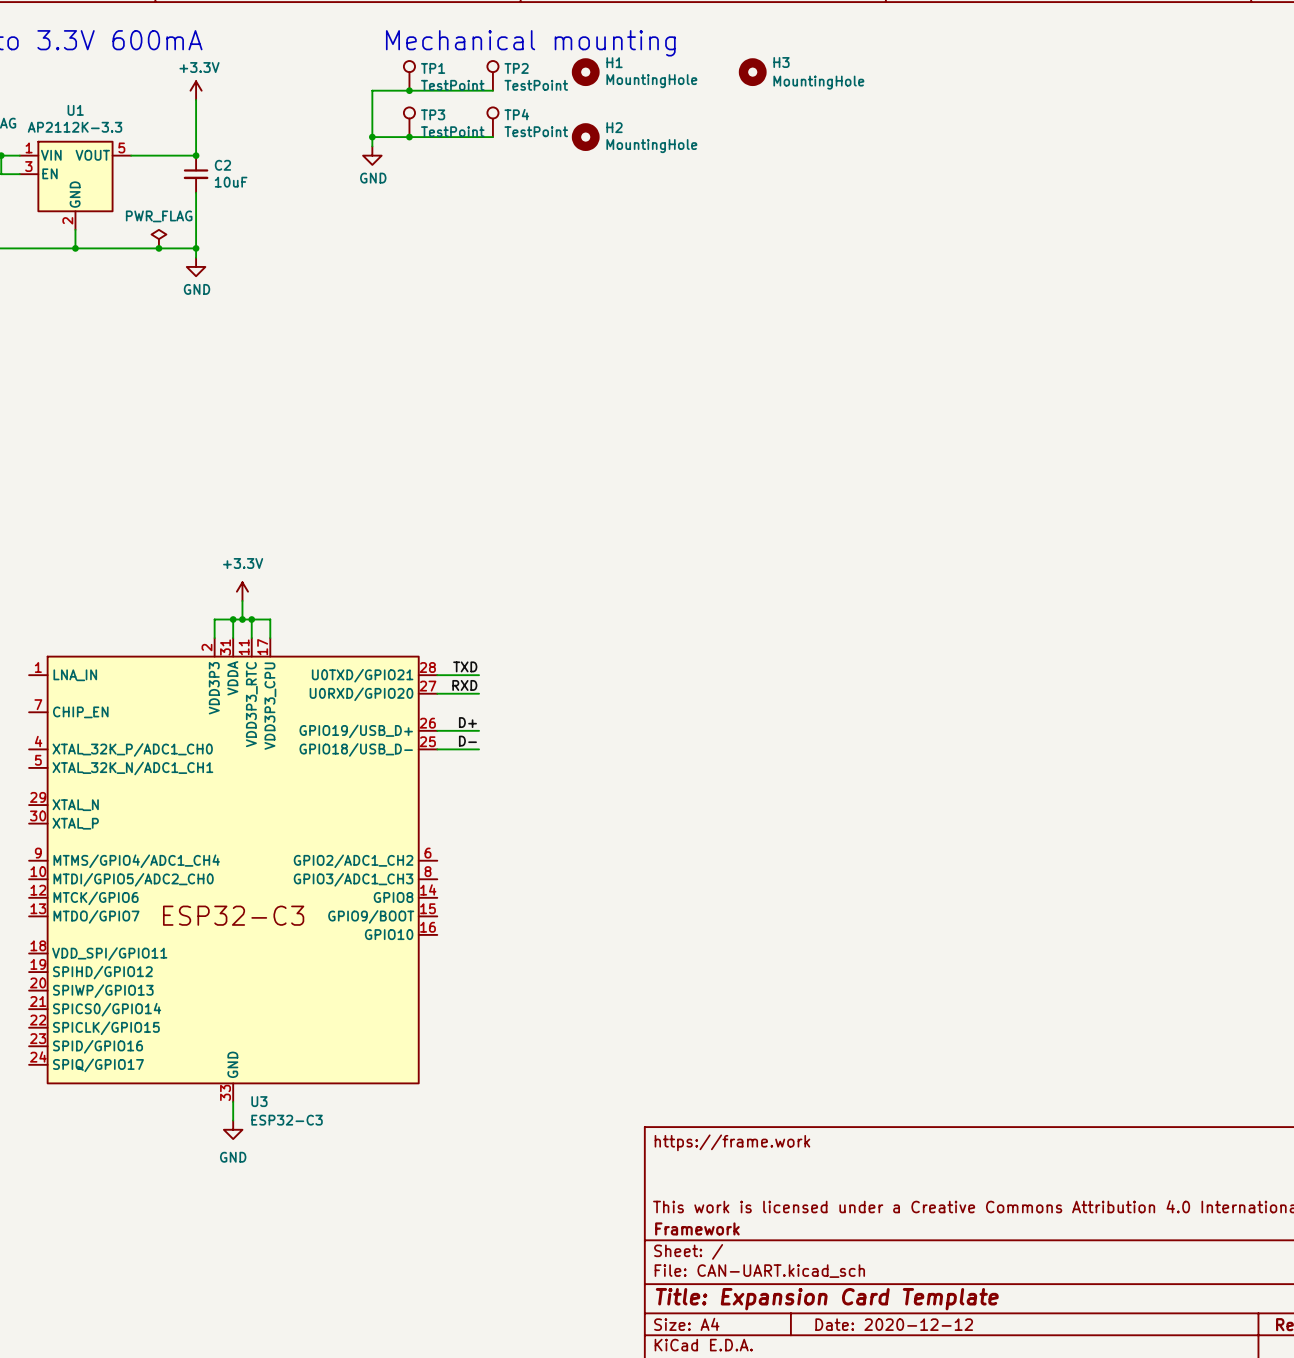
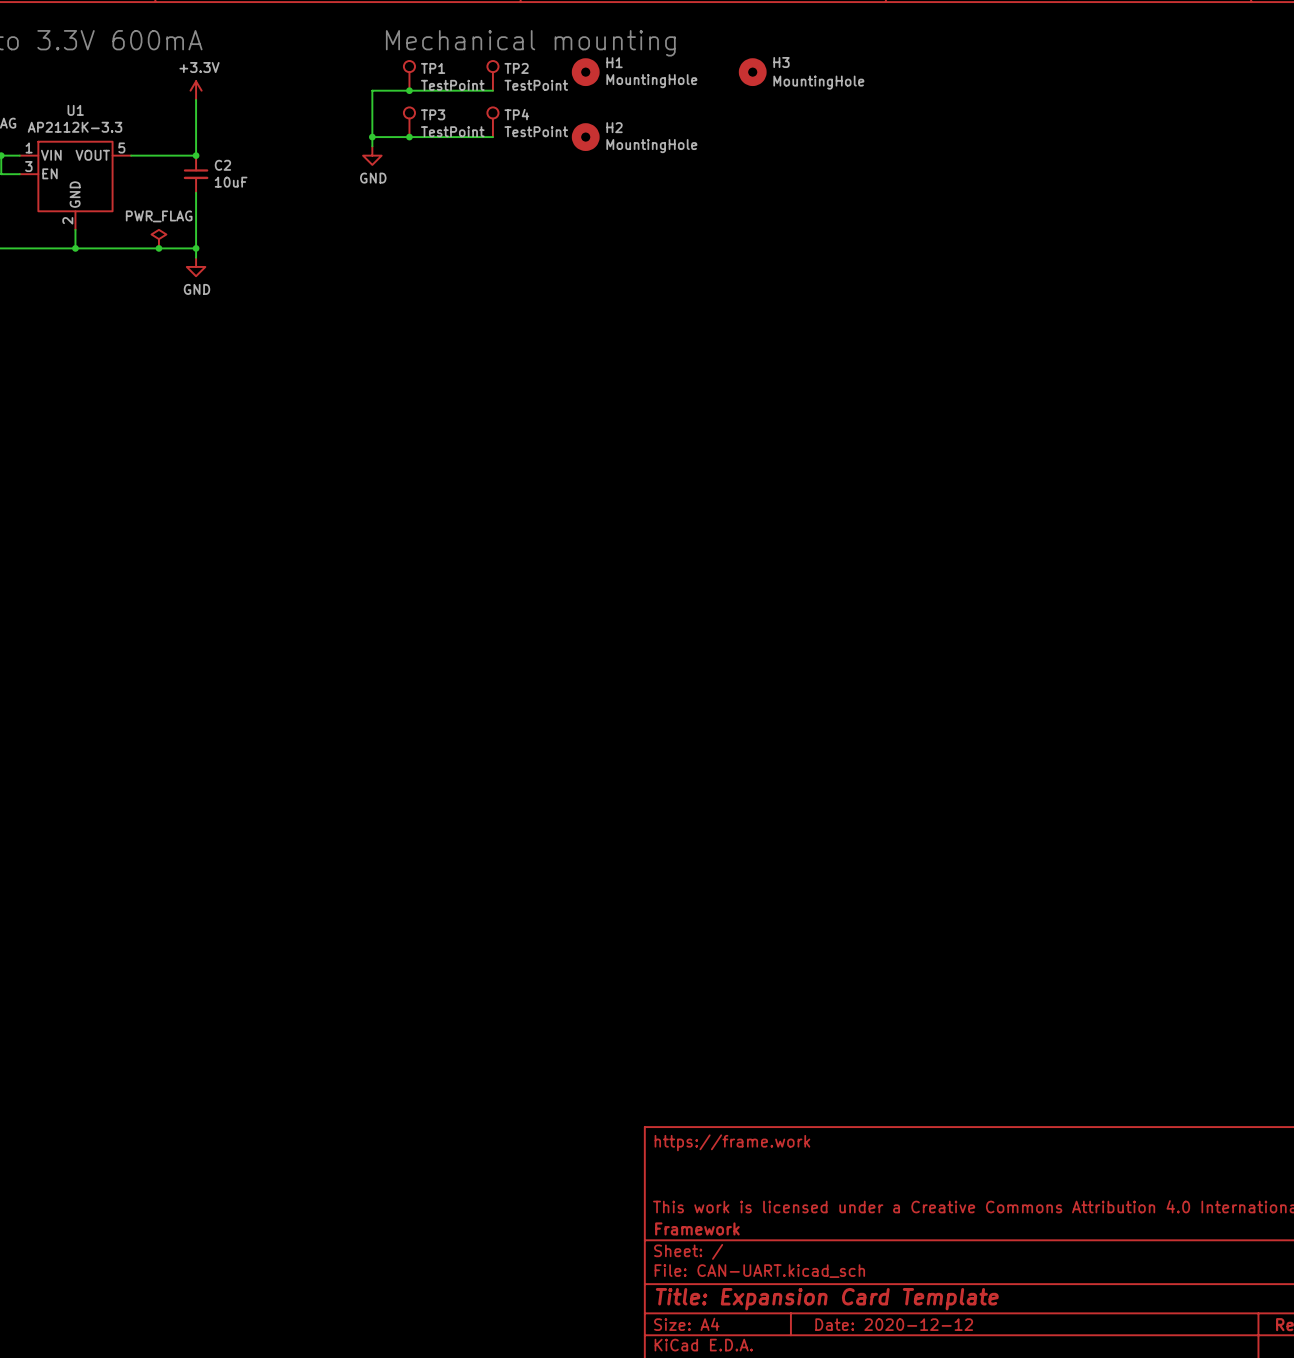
power symbol: +3.3V (242, 591) -> none
wire: (242, 600) (242, 619) -> none
wire: (233, 619) (233, 638) -> none
junction: (233, 619) -> none
junction: (242, 619) -> none
wire: (251, 619) (251, 638) -> none
junction: (251, 619) -> none
wire: (214, 638) (214, 619) (270, 619) (270, 638) -> none
label: TXD (465, 666) -> none
wire: (437, 675) (479, 675) -> none
label: RXD (464, 685) -> none
wire: (437, 693) (479, 693) -> none
label: D+ (467, 722) -> none
wire: (437, 730) (479, 730) -> none
label: D- (467, 741) -> none
wire: (437, 749) (479, 749) -> none
U3: ESP32-C3 (233, 870) -> none
wire: (233, 1101) (233, 1120) -> none
power symbol: GND (233, 1129) -> none

